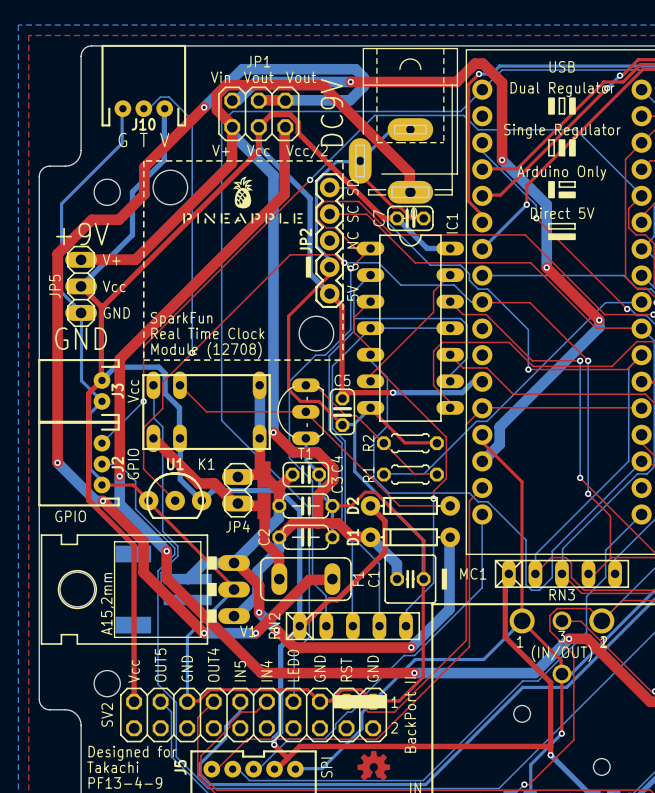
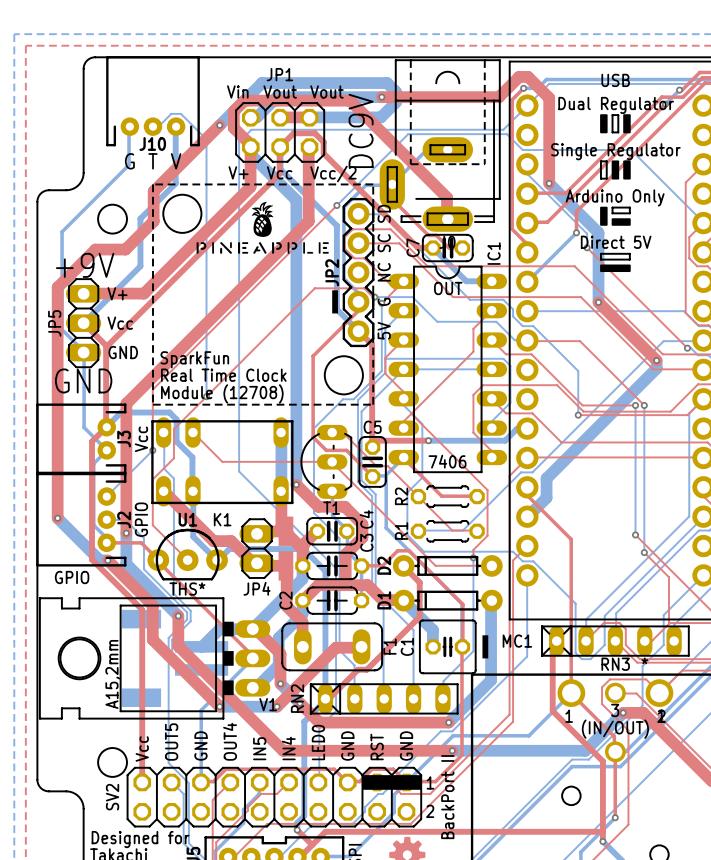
text: none -> OUT (448, 288)
text: none -> 7406 (447, 461)
text: none -> THS* (187, 589)
text: none -> * (644, 660)

